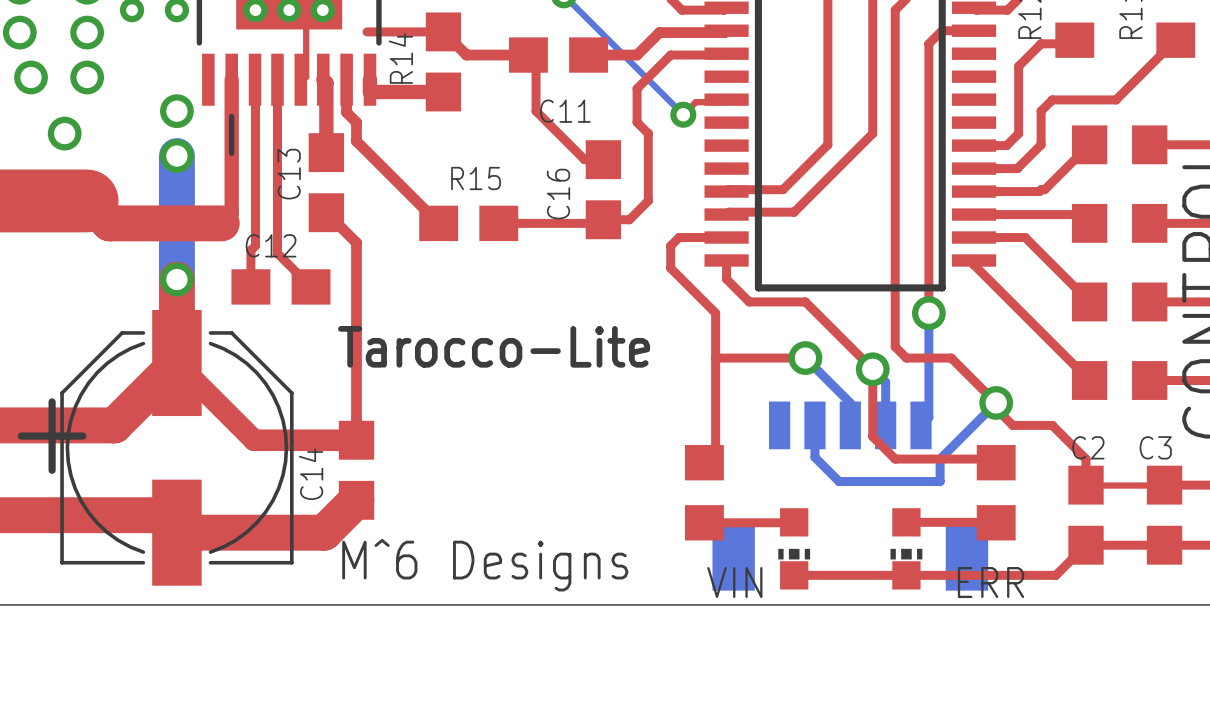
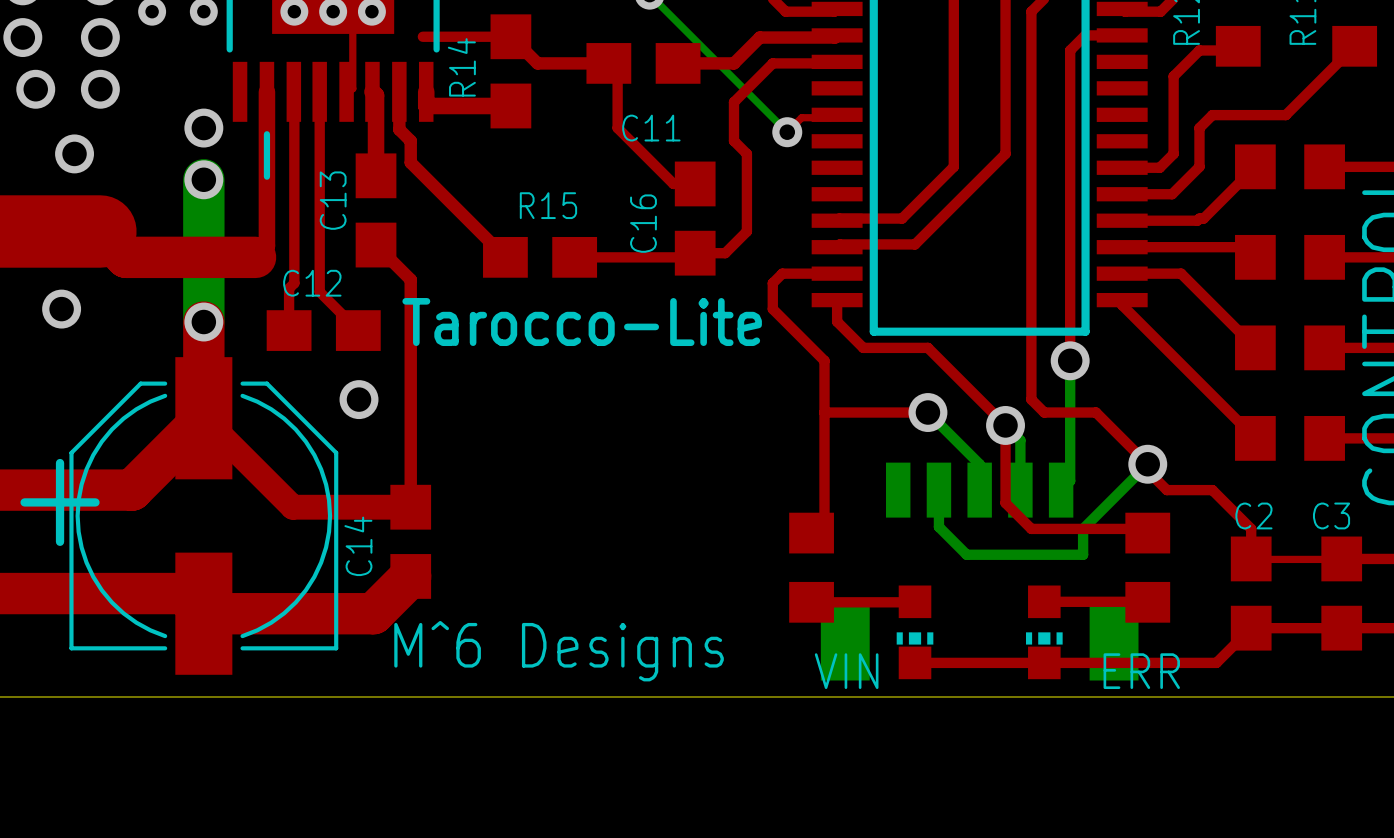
via: none -> (61, 309)
via: none -> (359, 399)
text position: Tarocco-Lite (494, 346) -> Tarocco-Lite (582, 322)

